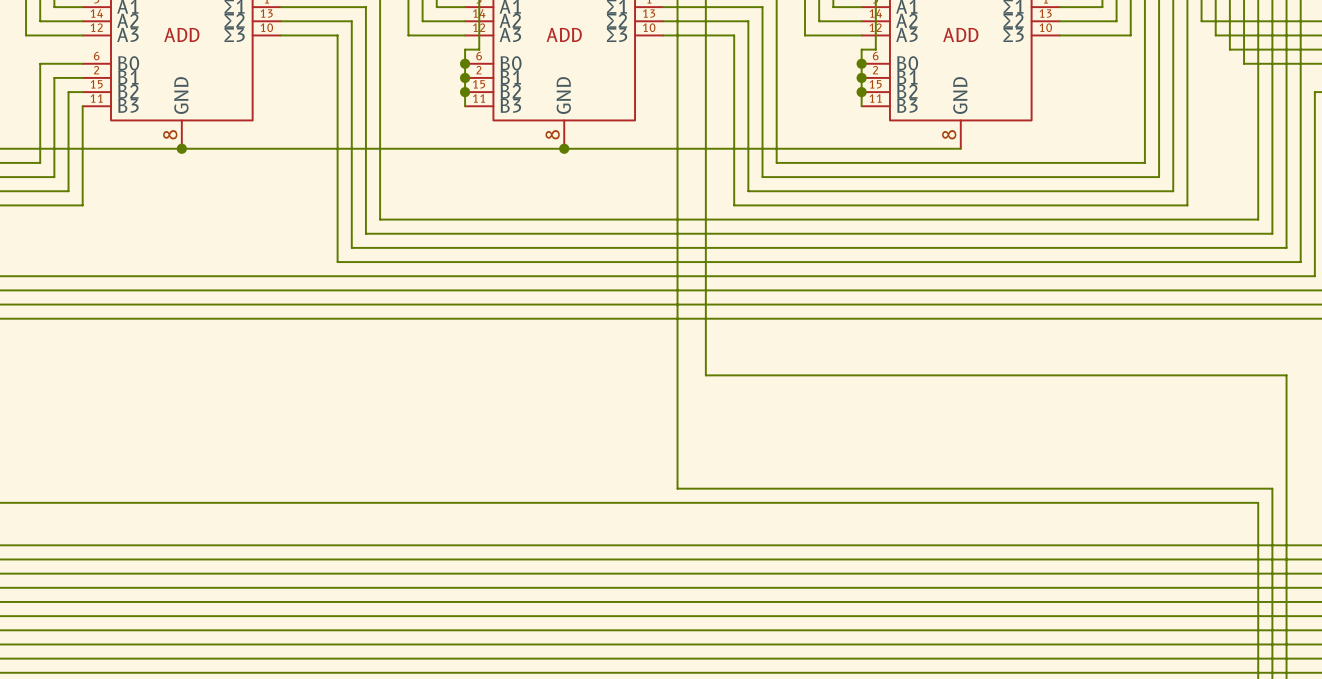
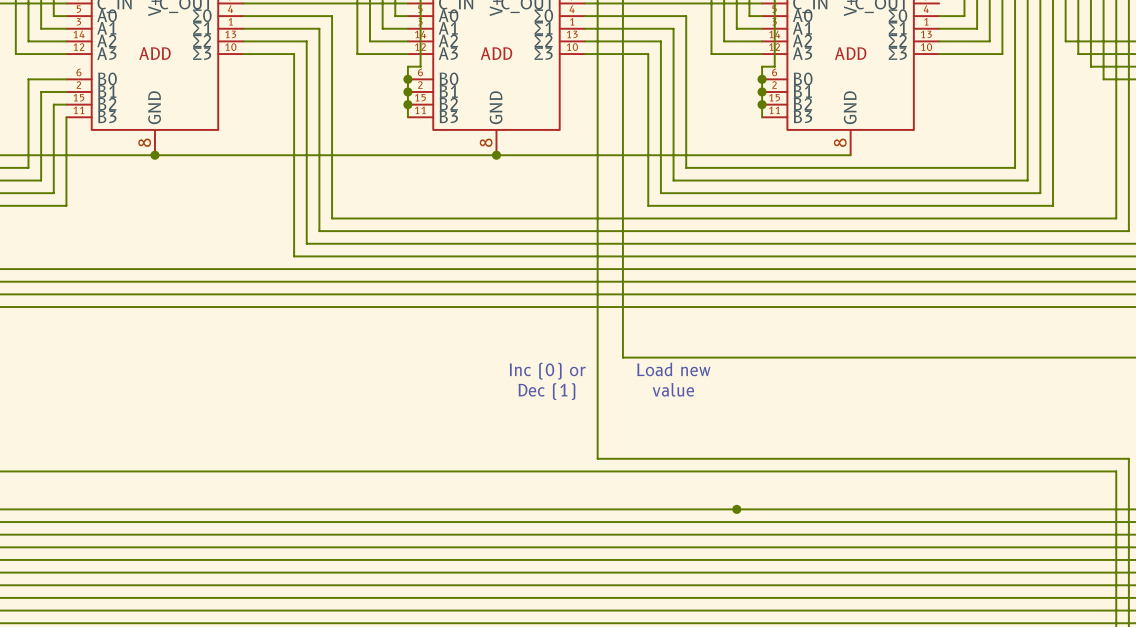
text: none -> Load new (673, 369)
text: none -> Inc (0) or (547, 371)
text: none -> value (673, 389)
text: none -> Dec (1) (546, 391)
junction: none -> (736, 509)

